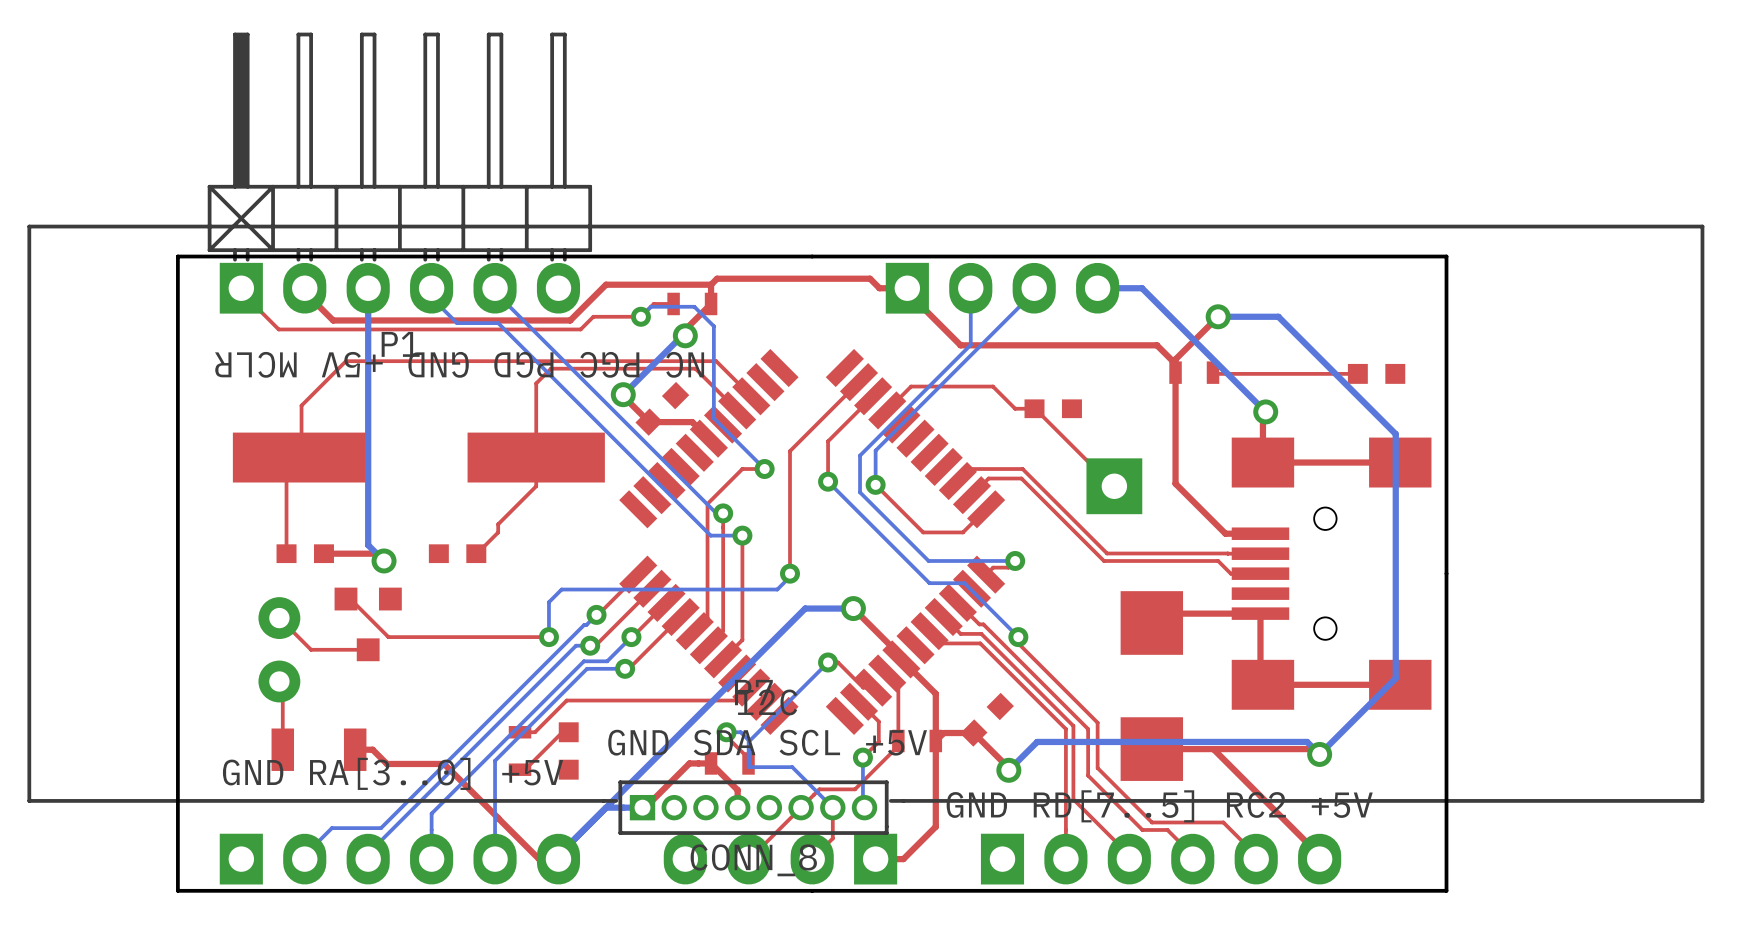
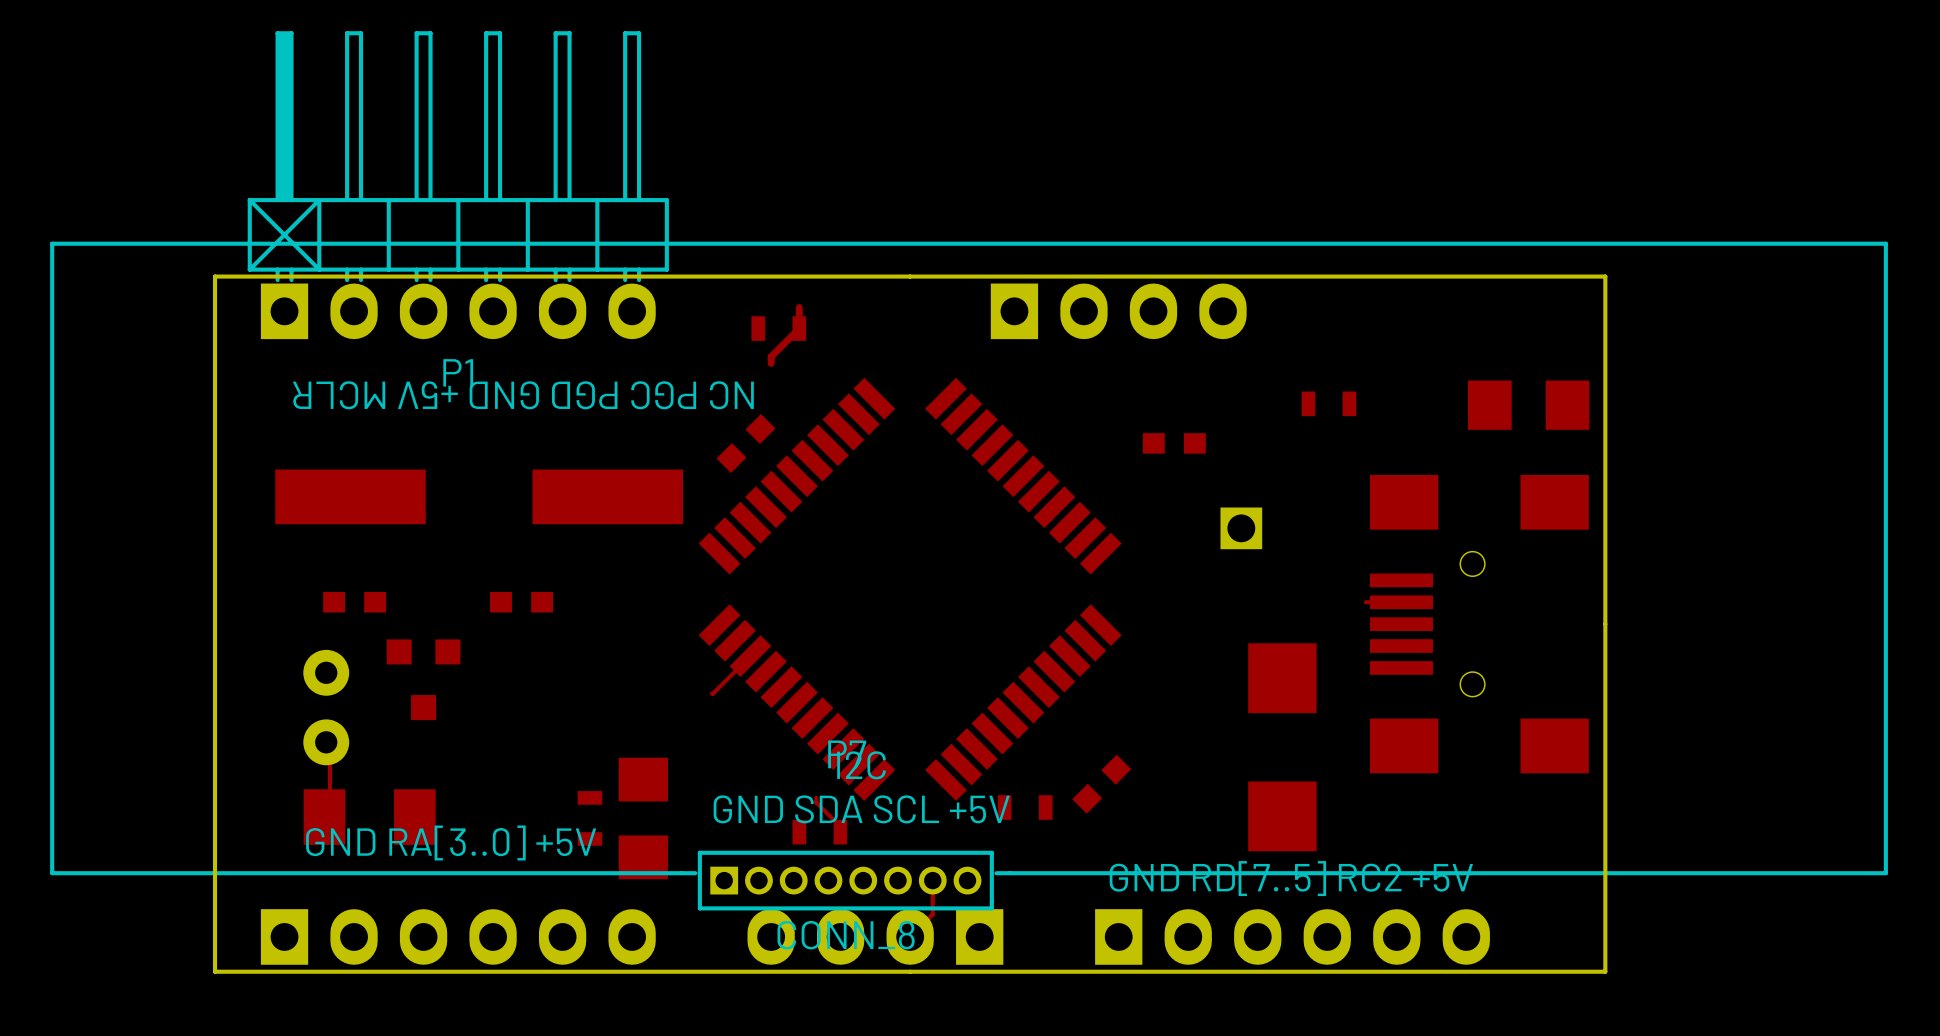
top track: (241, 288) (241, 292) (278, 329) (580, 329) (593, 316) (640, 316) (653, 303) (673, 303) -> none
top track: (304, 288) (304, 292) (333, 320) (570, 320) (606, 284) (711, 284) (717, 278) (870, 278) (879, 288) (907, 288) (907, 292) (960, 345) (1156, 345) (1175, 363) -> none
bottom track: (368, 288) (368, 545) (384, 560) -> none
bottom track: (431, 288) (431, 297) (456, 323) (498, 323) (710, 535) (742, 535) -> none
bottom track: (495, 288) (495, 292) (716, 513) (723, 513) -> none
bottom track: (970, 288) (970, 344) (860, 455) (860, 492) (928, 560) (1015, 560) -> none
bottom track: (1034, 288) (1034, 292) (875, 450) (875, 484) -> none
bottom track: (1097, 288) (1142, 288) (1265, 411) -> none
bottom track: (640, 316) (650, 306) (694, 306) (713, 326) (713, 418) (764, 469) -> none
via: (640, 316) -> none
bottom track: (1218, 316) (1278, 316) (1395, 434) (1395, 678) (1319, 754) (1307, 741) (1037, 741) (1008, 770) -> none
top track: (1218, 316) (1175, 359) (1175, 483) (1225, 533) (1260, 533) -> none
via: (1218, 316) -> none
bottom track: (685, 335) (682, 335) (623, 394) -> none
via: (685, 335) -> none
part footprint: [1347, 363, 1406, 384] -> [1467, 380, 1590, 430]
top track: (1213, 372) (1357, 373) -> none
top track: (858, 382) (790, 451) (790, 573) -> none
top track: (623, 394) (649, 422) (692, 422) (708, 438) -> none
via: (623, 394) -> none
top track: (751, 396) (716, 361) (345, 361) (301, 405) (301, 457) (286, 472) (286, 553) -> none
top track: (873, 396) (828, 441) (828, 481) -> none
top track: (737, 410) (695, 368) (550, 368) (536, 383) (536, 486) (498, 524) (498, 532) (476, 553) -> none
top track: (887, 410) (911, 386) (992, 386) (1015, 408) (1035, 408) (1114, 486) -> none
top track: (1265, 411) (1262, 414) (1262, 462) (1400, 462) -> none
via: (1265, 411) -> none
part footprint: [1086, 458, 1143, 515] -> [1220, 507, 1263, 550]
top track: (764, 469) (742, 469) (707, 503) (707, 618) (694, 630) -> none
via: (764, 469) -> none
bottom track: (828, 481) (929, 583) (964, 583) (1018, 637) -> none
via: (828, 481) -> none
top track: (957, 481) (969, 469) (1022, 469) (1107, 553) (1227, 553) -> none
top track: (875, 484) (923, 532) (962, 532) (986, 509) -> none
via: (875, 484) -> none
top track: (967, 499) (988, 478) (1021, 478) (1103, 560) (1218, 560) (1230, 573) (1260, 573) -> none
top track: (723, 513) (723, 631) (708, 645) -> none
via: (723, 513) -> none
top track: (742, 535) (742, 639) (723, 659) -> none
via: (742, 535) -> none
top track: (323, 553) (376, 553) (384, 560) -> none
via: (384, 560) -> none
top track: (1015, 560) (1008, 567) (993, 567) (986, 574) -> none
via: (1015, 560) -> none
bottom track: (790, 573) (790, 576) (777, 589) (561, 589) (548, 602) (548, 637) -> none
via: (790, 573) -> none
top track: (638, 574) (596, 614) -> none
top track: (652, 588) (594, 646) (590, 645) -> none
top track: (345, 599) (350, 599) (388, 637) (548, 637) -> none
top track: (957, 602) (979, 624) (983, 624) (1088, 729) (1088, 775) (1142, 829) (1167, 829) (1192, 855) (1192, 859) -> none
bottom track: (853, 608) (805, 608) (558, 855) (558, 859) -> none
top track: (853, 608) (935, 693) (935, 826) (903, 859) (875, 859) (875, 862) -> none
via: (853, 608) -> none
bottom track: (596, 614) (584, 624) (381, 828) (331, 828) (304, 855) (304, 859) -> none
via: (596, 614) -> none
top track: (680, 617) (628, 668) (625, 668) -> none
top track: (943, 617) (960, 633) (981, 633) (1073, 725) (1073, 799) (1129, 855) (1129, 859) -> none
top track: (279, 618) (311, 649) (368, 649) -> none
top track: (1151, 622) (1161, 613) (1260, 613) (1260, 682) (1262, 684) (1400, 684) -> none
top track: (929, 631) (941, 643) (980, 643) (1065, 729) (1065, 859) -> none
via: (548, 637) -> none
bottom track: (631, 637) (607, 661) (583, 661) (431, 813) (431, 859) -> none
via: (631, 637) -> none
top track: (1018, 637) (1018, 643) (1097, 722) (1097, 768) (1152, 822) (1223, 822) (1256, 855) (1256, 859) -> none
via: (1018, 637) -> none
bottom track: (590, 645) (576, 645) (368, 853) (368, 859) -> none
via: (590, 645) -> none
bottom track: (828, 662) (748, 741) -> none
top track: (828, 662) (838, 662) (863, 687) (873, 687) -> none
via: (828, 662) -> none
bottom track: (625, 668) (587, 668) (495, 760) (495, 859) -> none
via: (625, 668) -> none
top track: (887, 673) (898, 684) (898, 745) (854, 789) (819, 789) (748, 859) -> none
top track: (751, 687) (738, 700) (566, 700) (535, 732) (520, 732) -> none
top track: (858, 701) (878, 721) (878, 741) (862, 757) -> none
part footprint: [558, 722, 579, 780] -> [618, 757, 668, 880]
part footprint: [271, 728, 367, 771] -> [303, 789, 436, 845]
top track: (568, 732) (562, 732) (525, 769) (520, 769) -> none
bottom track: (726, 732) (740, 732) (748, 740) (748, 767) (792, 767) (832, 807) -> none
via: (726, 732) -> none
top track: (935, 740) (943, 733) (973, 733) (1008, 768) (1008, 770) -> none
top track: (355, 749) (372, 749) (386, 763) (444, 763) (539, 859) (558, 859) -> none
top track: (1151, 749) (1321, 749) (1319, 754) -> none
top track: (1213, 749) (1319, 855) (1319, 859) -> none
via: (1319, 754) -> none
bottom track: (862, 757) (862, 806) (864, 807) -> none
via: (862, 757) -> none
via: (1008, 770) -> none
bottom track: (642, 807) (606, 807) -> none
top track: (737, 807) (737, 790) (711, 763) (689, 763) (645, 807) (642, 807) -> none

